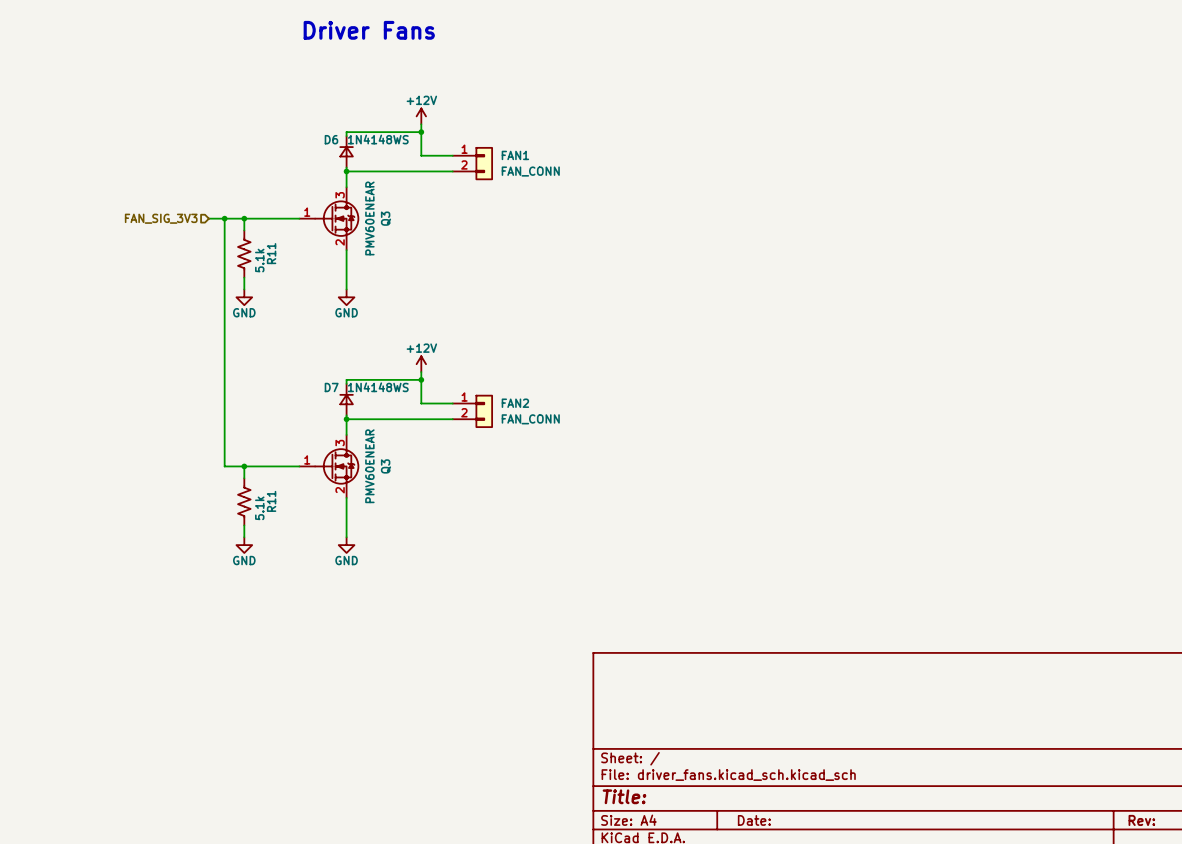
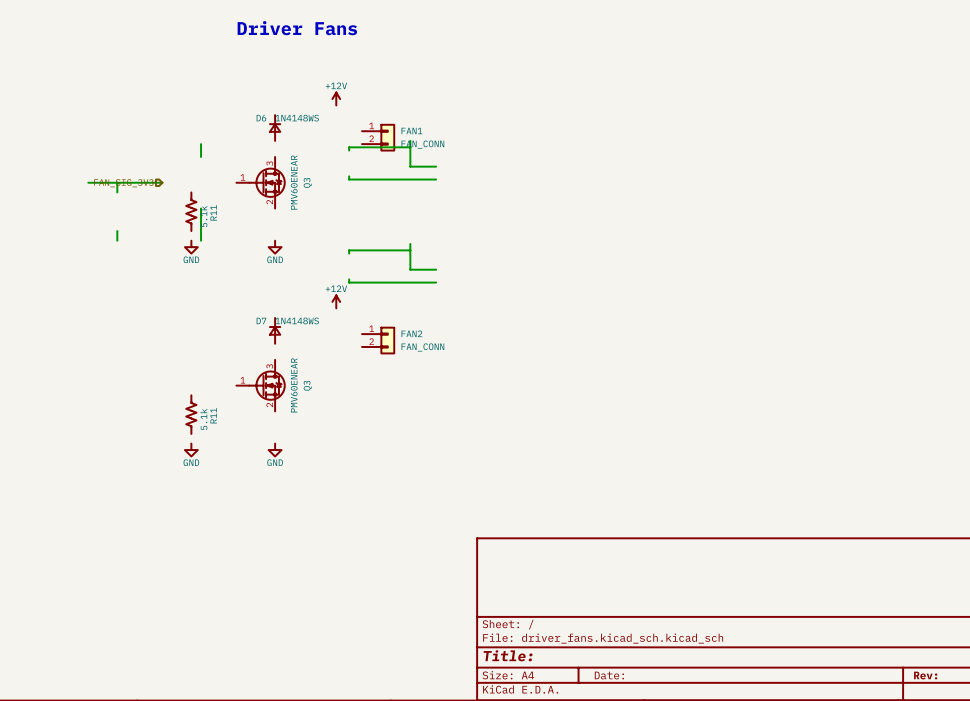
wire: (421, 124) (421, 155) (452, 155) -> (410, 140) (410, 166) (436, 166)
wire: (421, 132) (346, 132) (346, 136) -> (410, 147) (349, 147) (349, 150)
junction: (421, 132) -> none
wire: (346, 167) (346, 187) -> none
wire: none -> (201, 144) (201, 156)
wire: (346, 171) (452, 171) -> none
junction: (346, 171) -> none
wire: none -> (349, 176) (349, 179) (436, 179)
wire: (208, 218) (299, 218) -> (162, 182) (88, 182)
wire: (224, 218) (224, 466) (299, 466) -> none
junction: (224, 218) -> none
wire: (244, 218) (244, 230) -> (117, 182) (117, 192)
junction: (244, 218) -> none
wire: (346, 250) (346, 289) -> (201, 208) (201, 240)
wire: (244, 277) (244, 289) -> (117, 231) (117, 240)
wire: none -> (349, 279) (349, 282) (436, 282)
wire: (421, 372) (421, 403) (452, 403) -> (410, 243) (410, 269) (436, 269)
wire: (421, 379) (346, 379) (346, 383) -> (410, 250) (349, 250) (349, 253)
junction: (421, 379) -> none
wire: (346, 415) (346, 434) -> none
wire: (346, 419) (452, 419) -> none
junction: (346, 419) -> none
wire: (244, 466) (244, 478) -> none
junction: (244, 466) -> none
wire: (346, 497) (346, 537) -> none
wire: (244, 525) (244, 537) -> none

